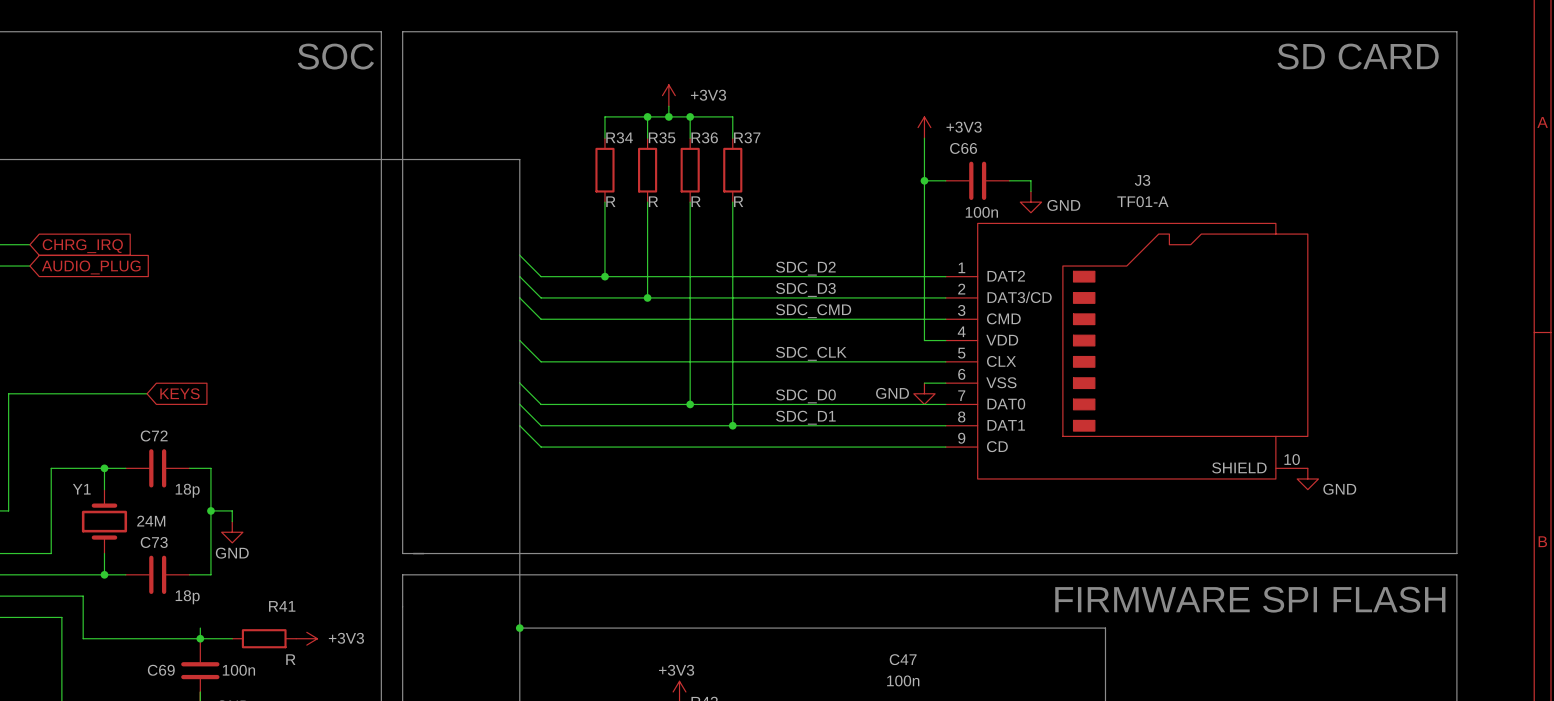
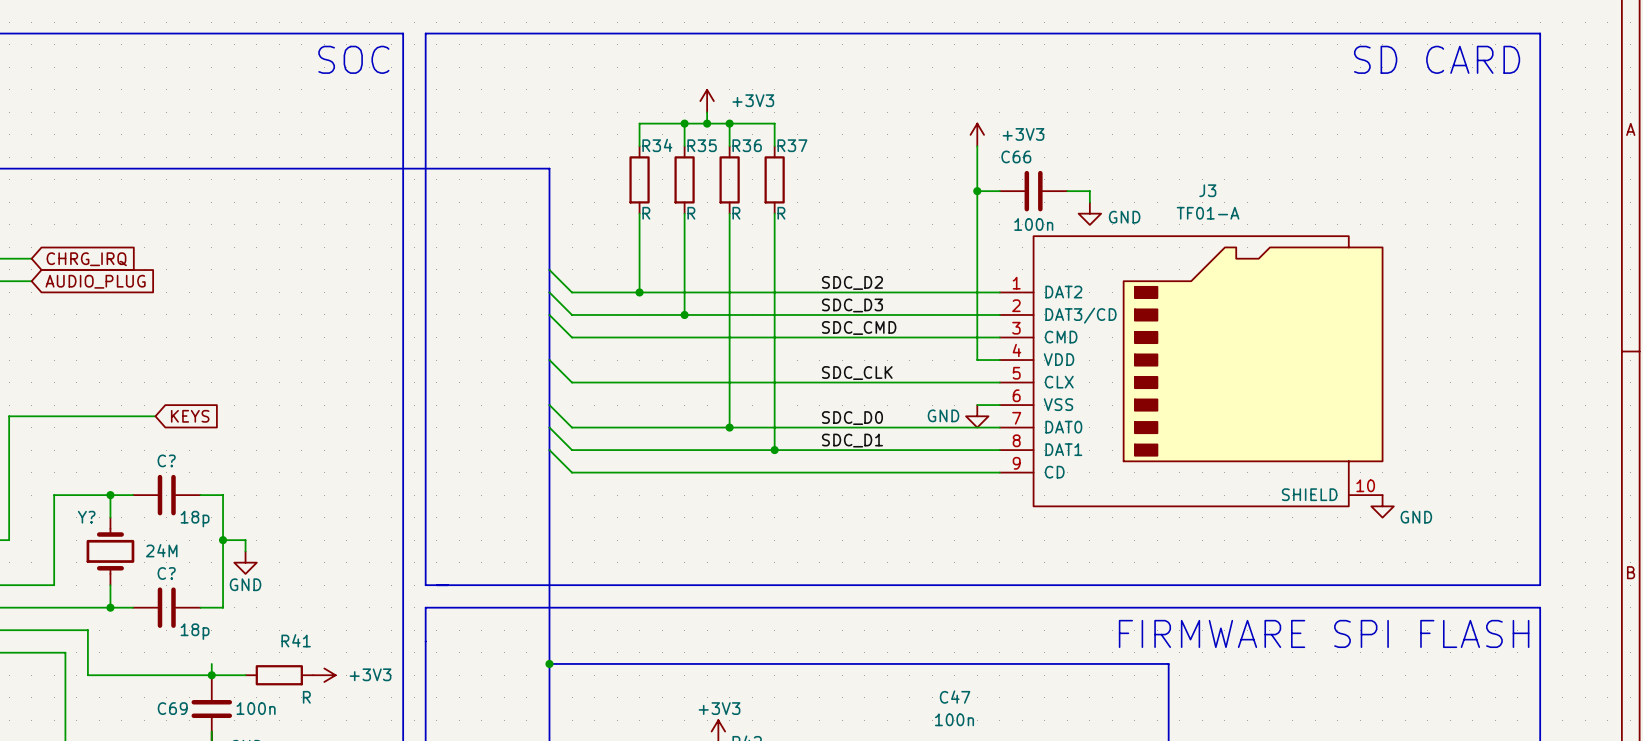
C72 name: C72 (154, 435) -> C? (166, 460)
Y1 name: Y1 (81, 489) -> Y? (86, 517)
C73 name: C73 (154, 542) -> C? (166, 573)

